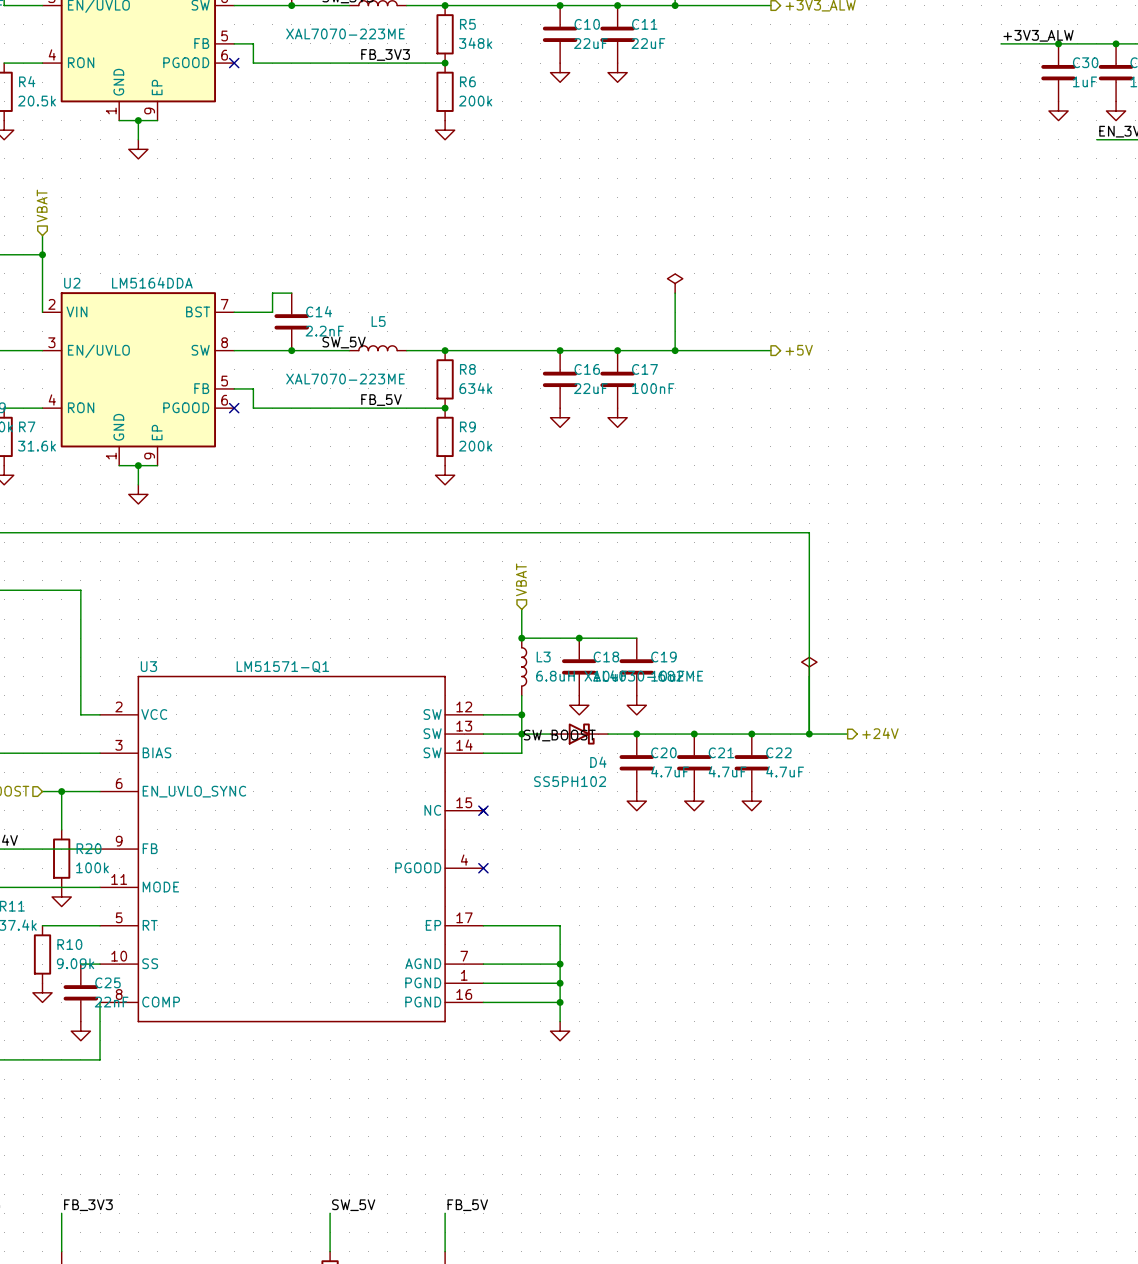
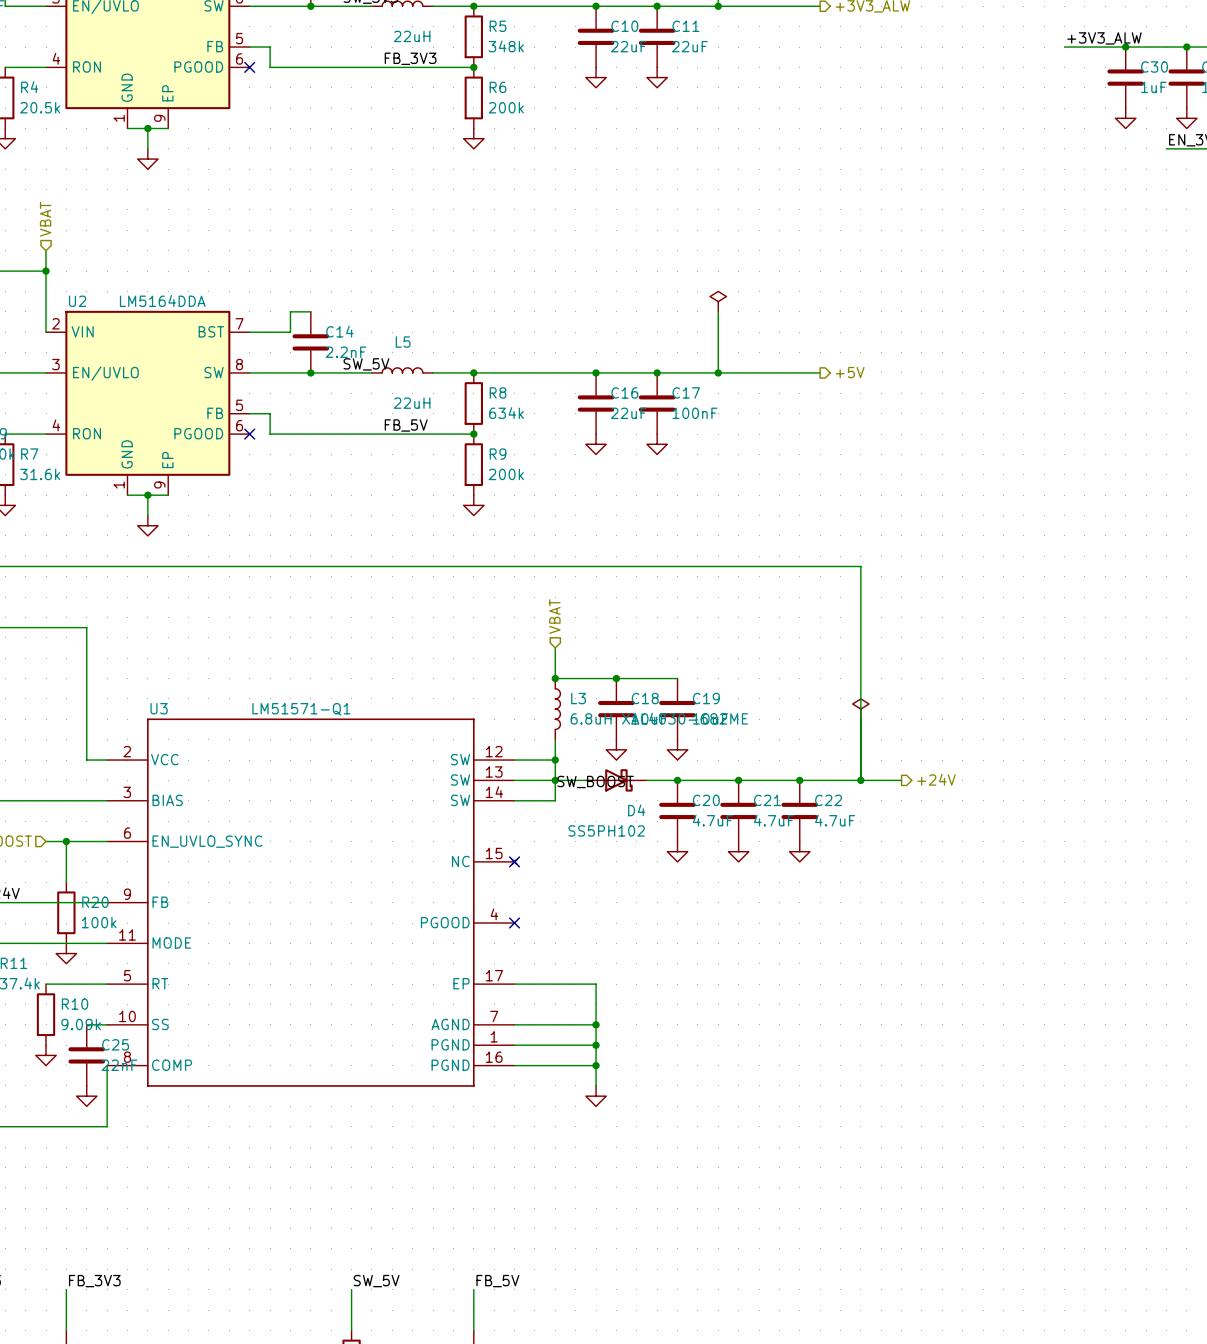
part value: XAL7070-223ME (345, 33) -> 22uH (412, 36)
L5 value: XAL7070-223ME (345, 379) -> 22uH (412, 403)

